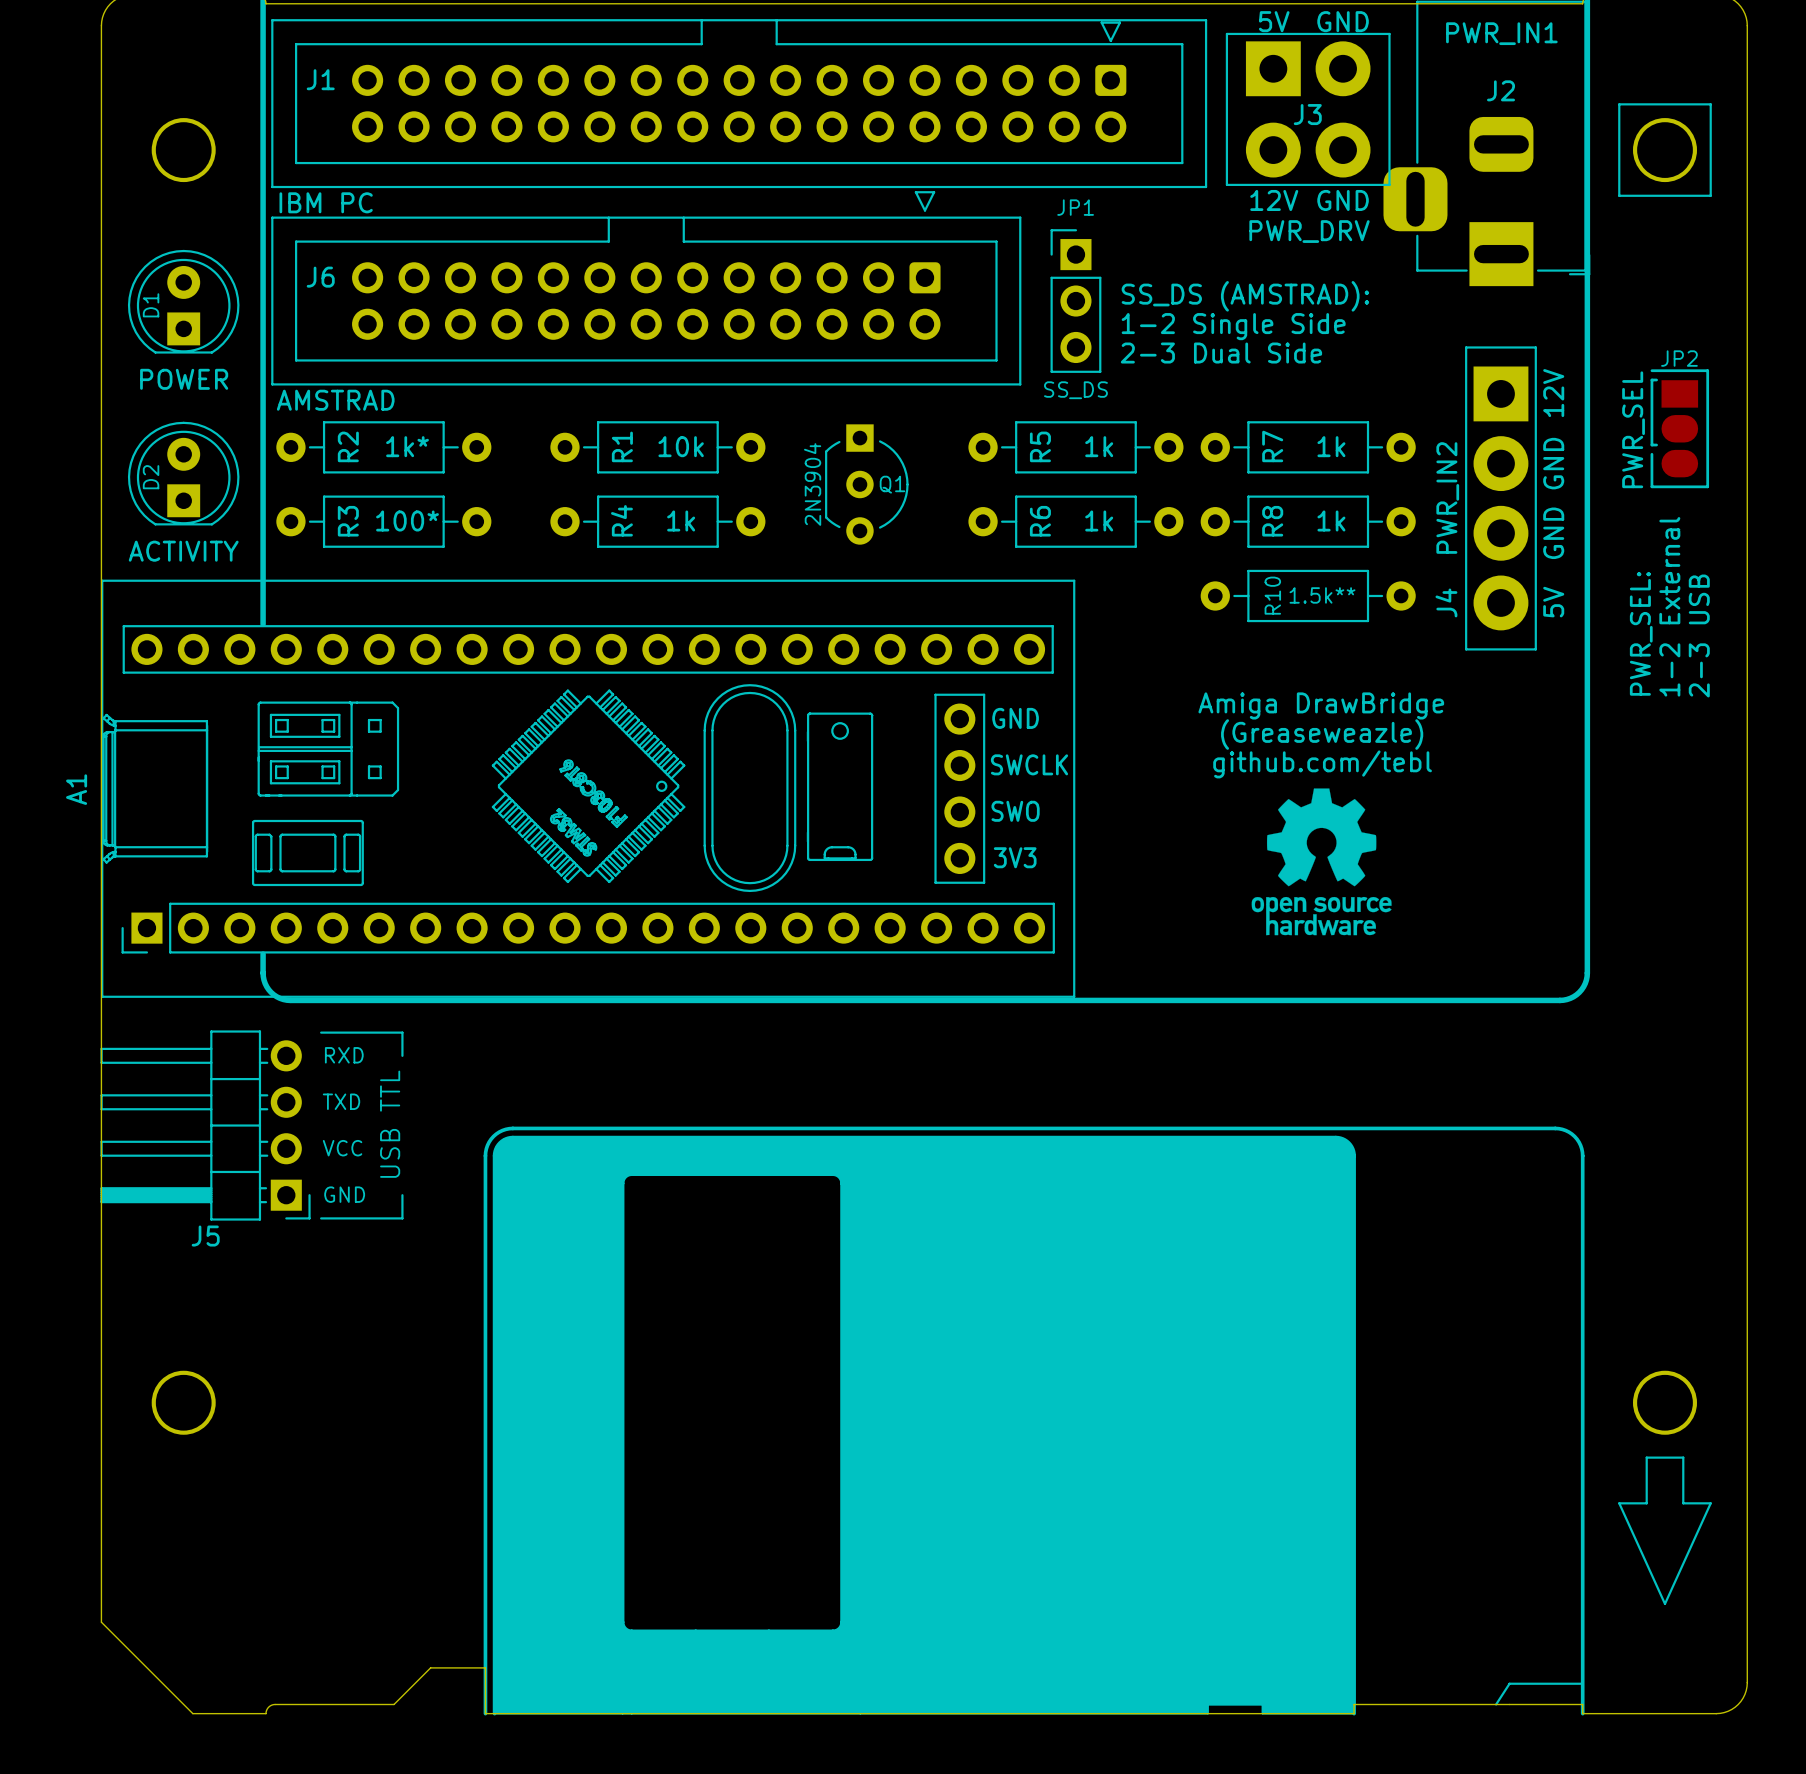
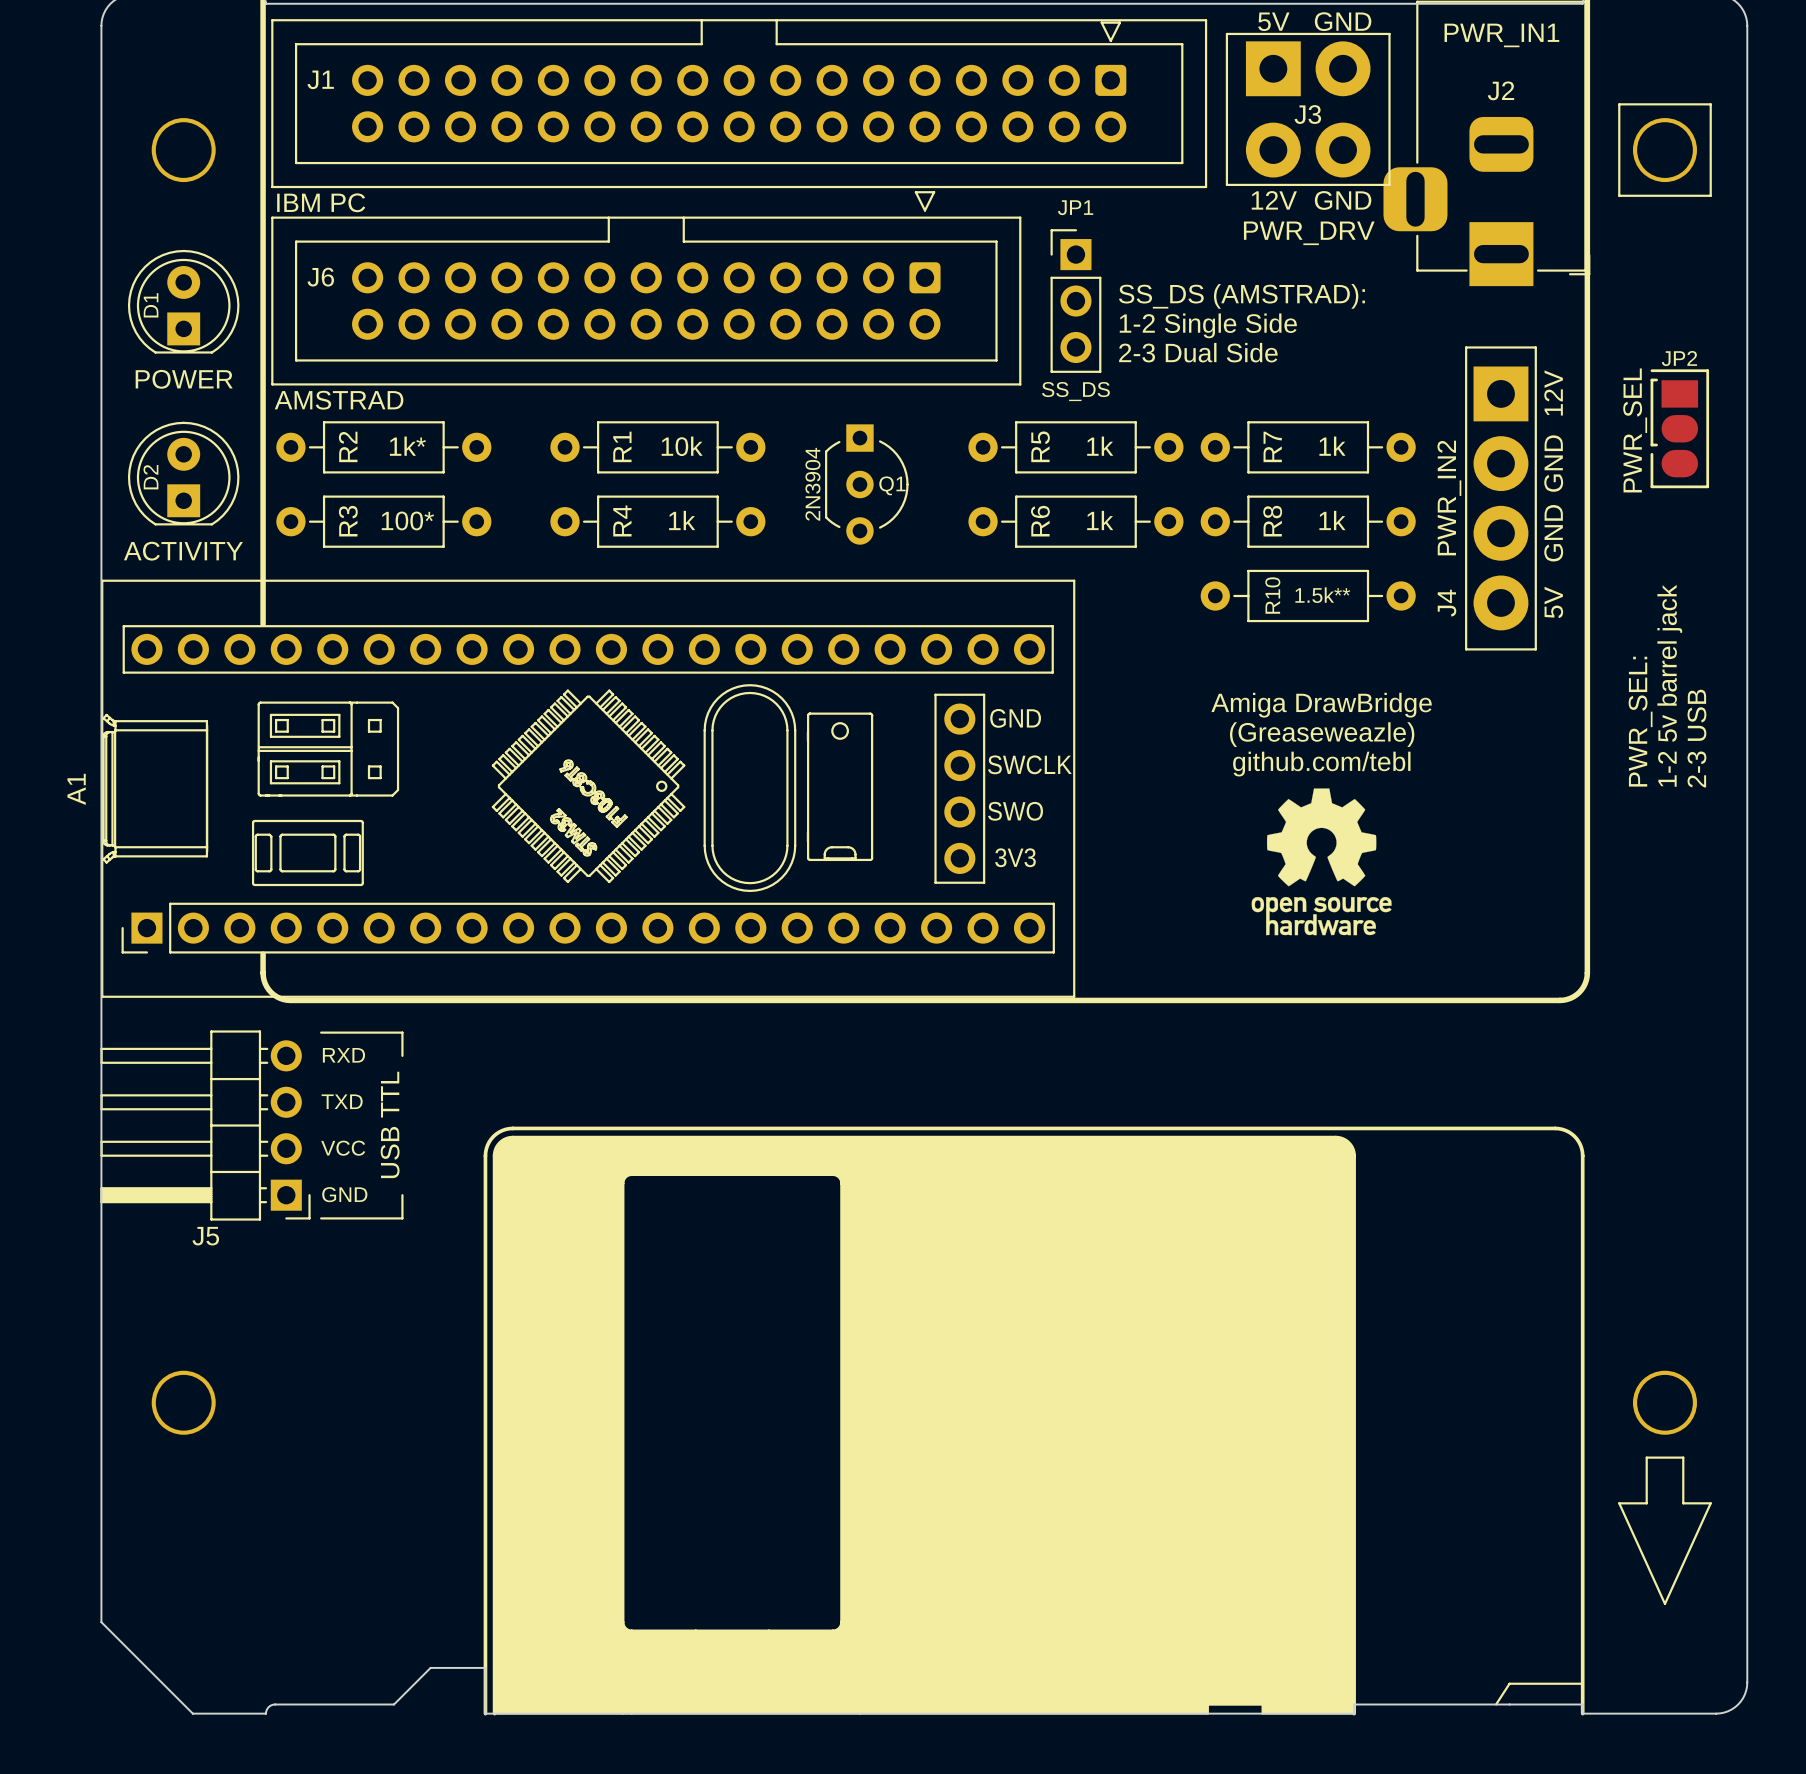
text: 1-2 External (1669, 606) -> none
text position: PWR_SEL: (1641, 633) -> PWR_SEL: (1640, 721)
text position: 2-3 USB (1699, 635) -> 2-3 USB (1696, 738)
text: none -> 1-2 5v barrel jack (1669, 685)

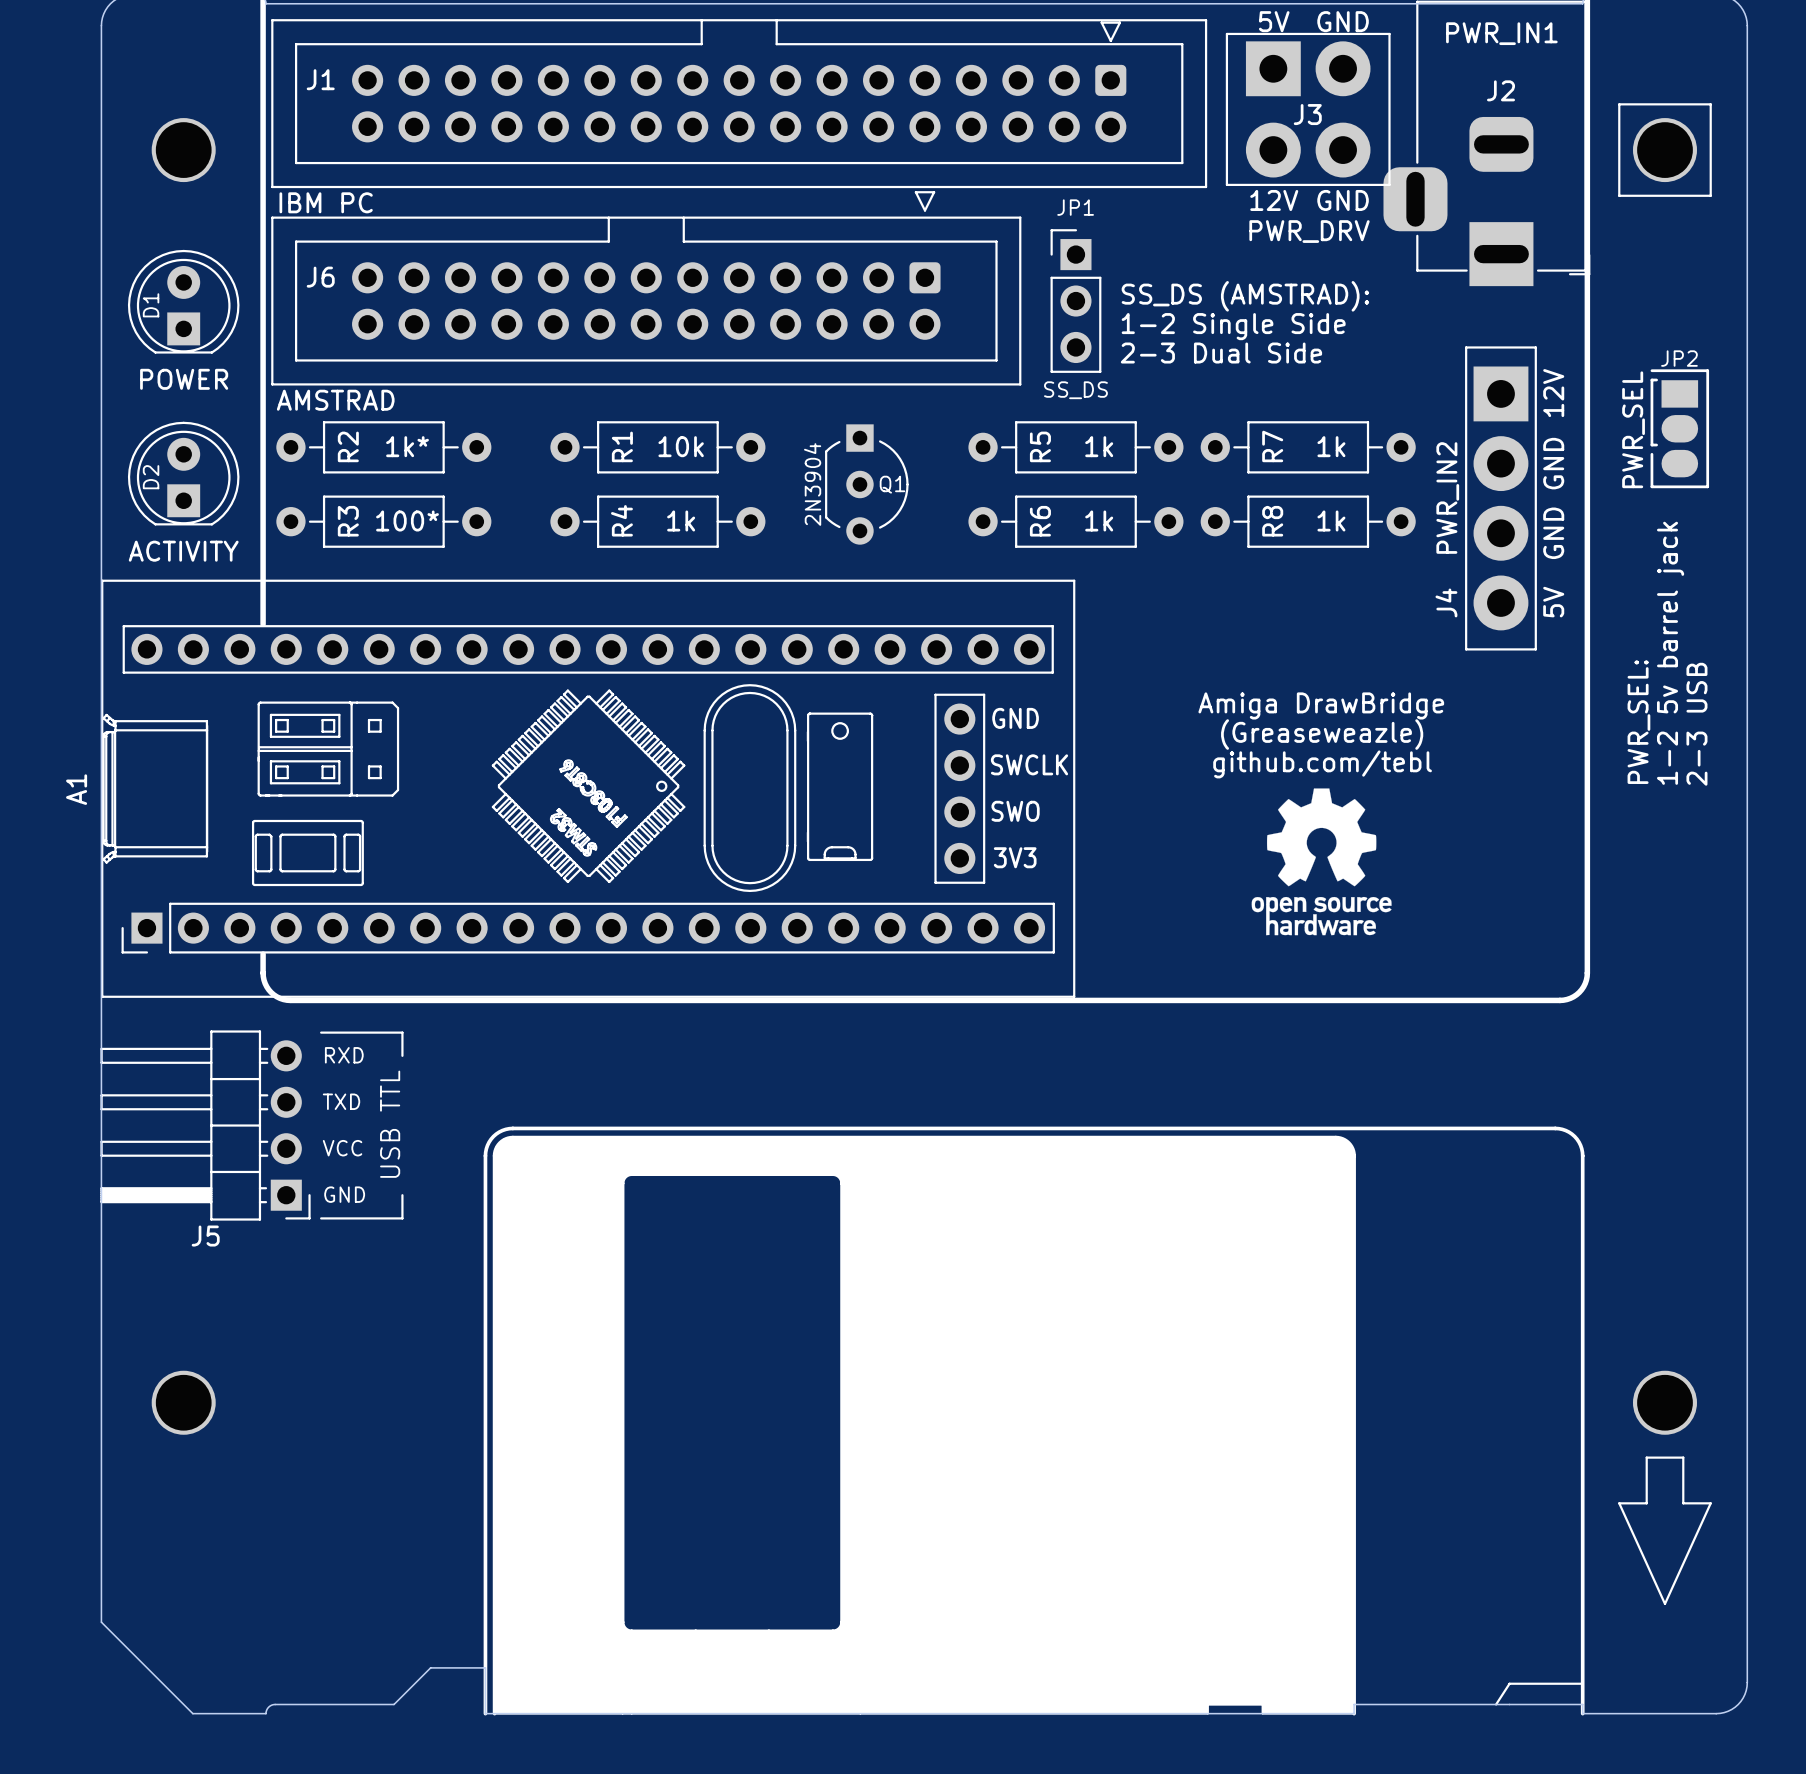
R10: 1.5k** (1308, 595) -> none

